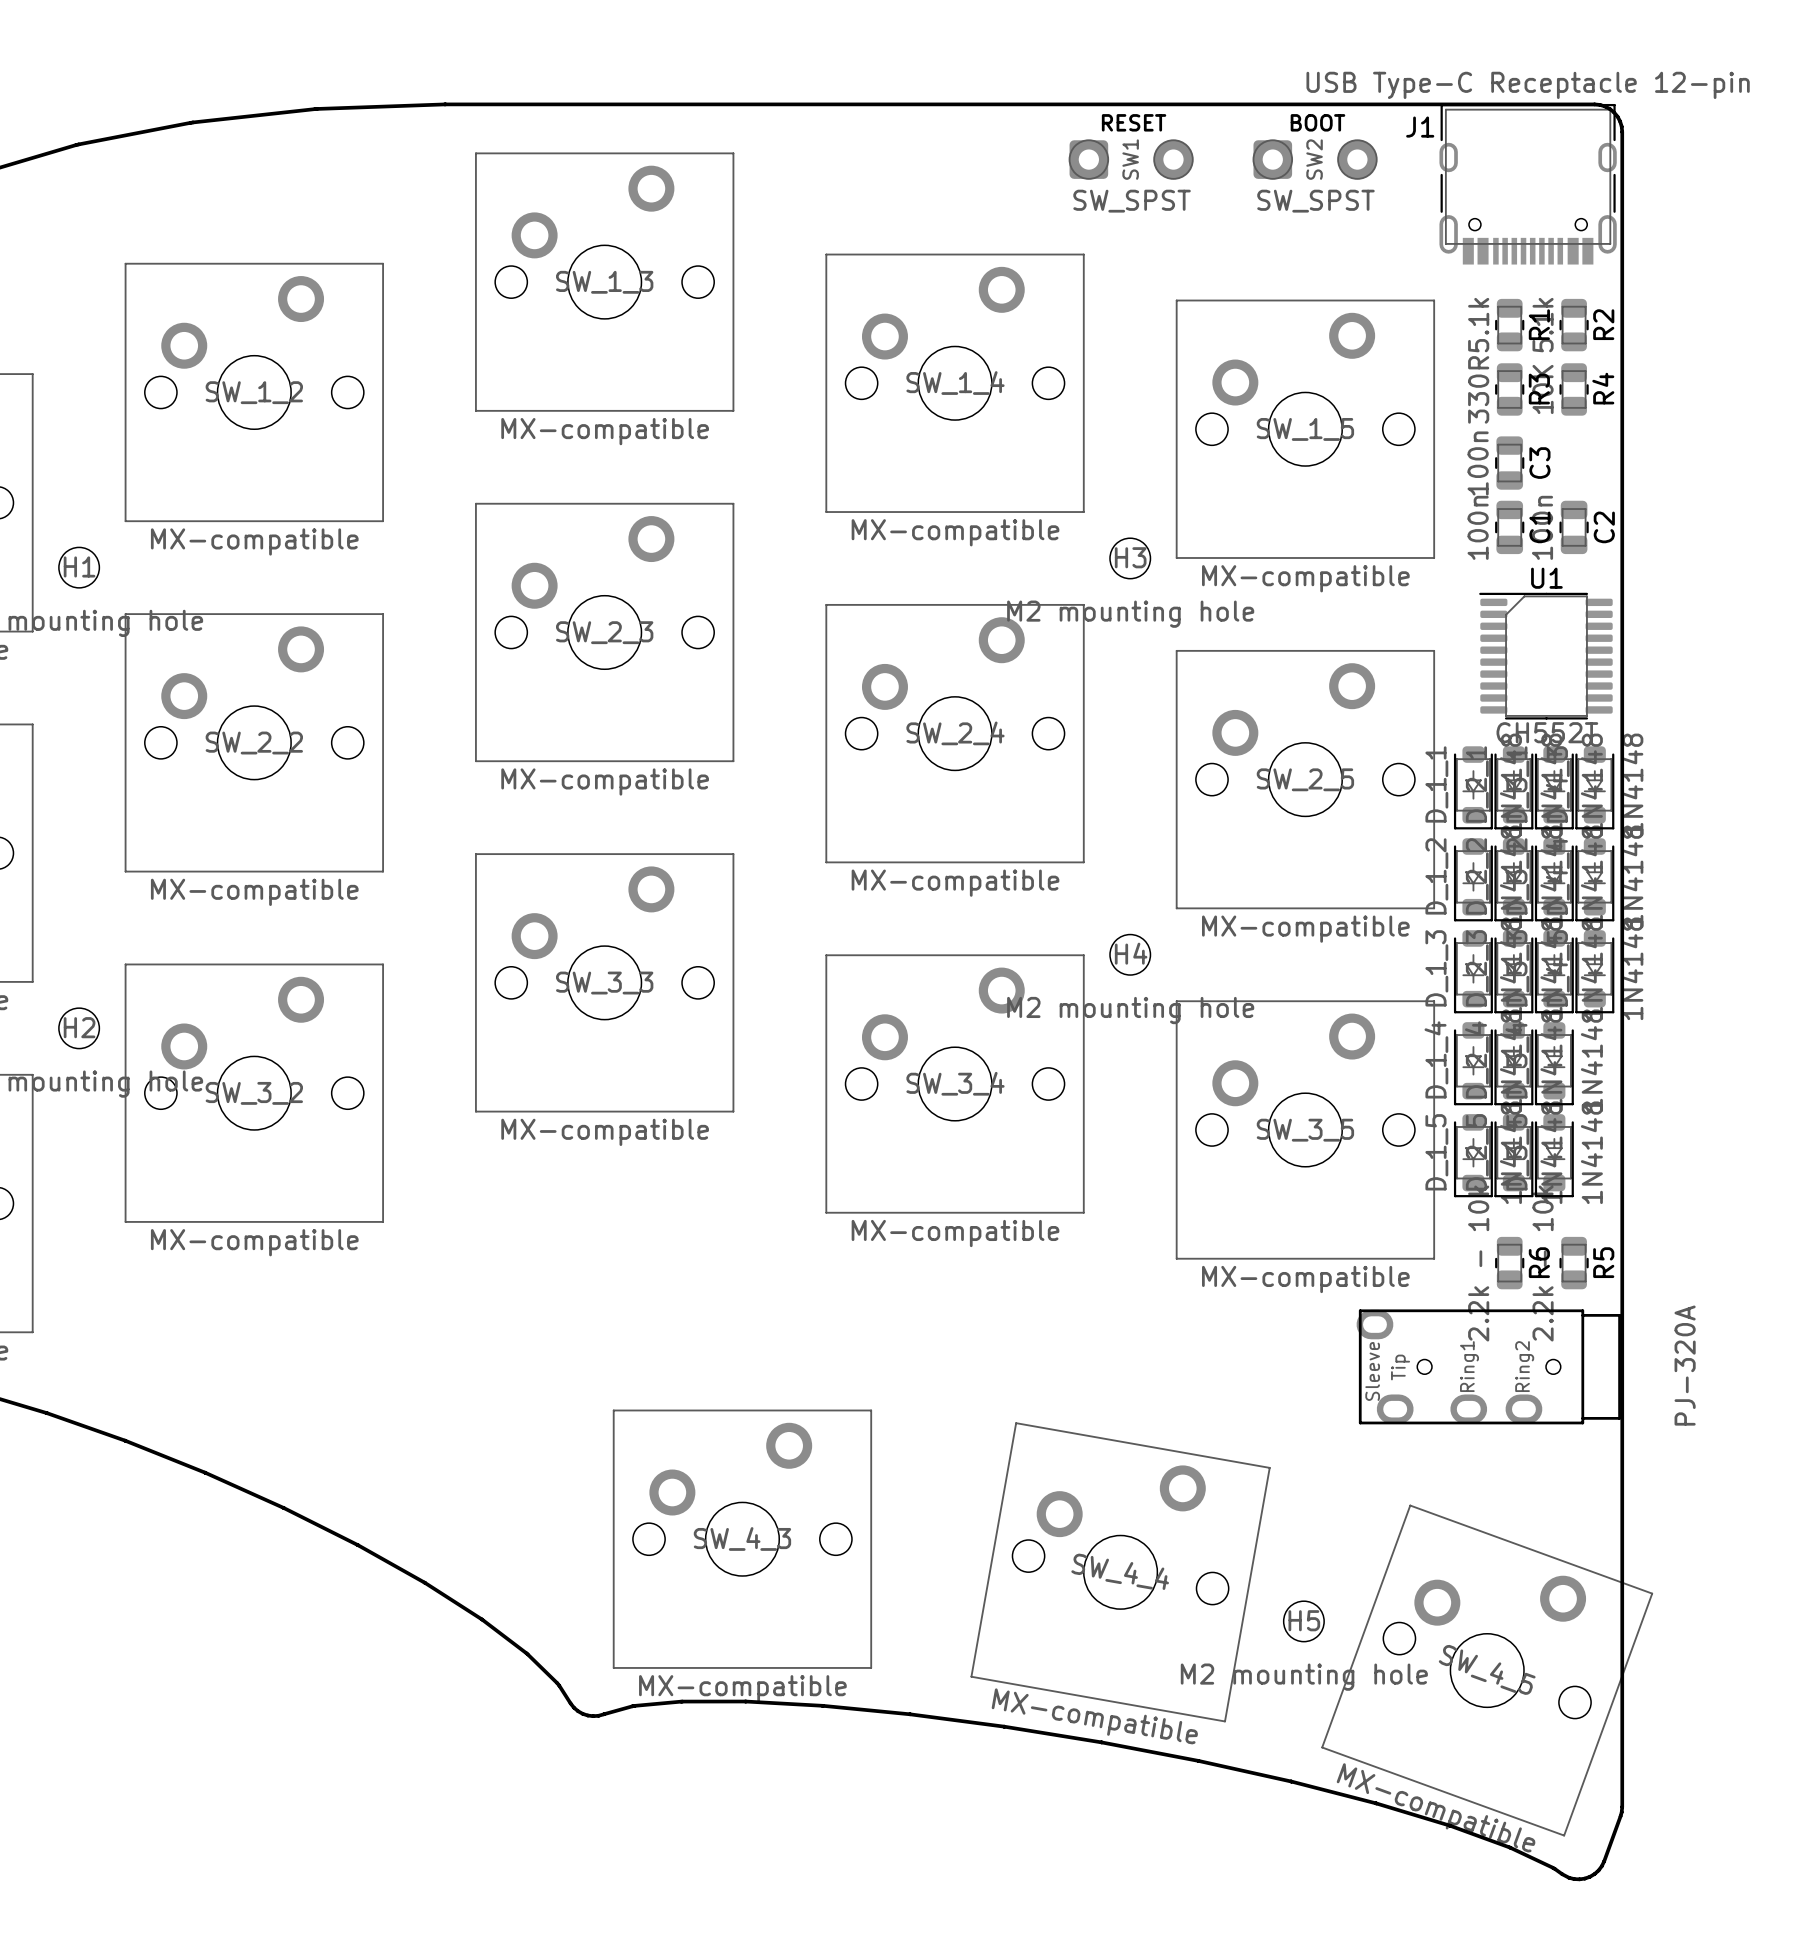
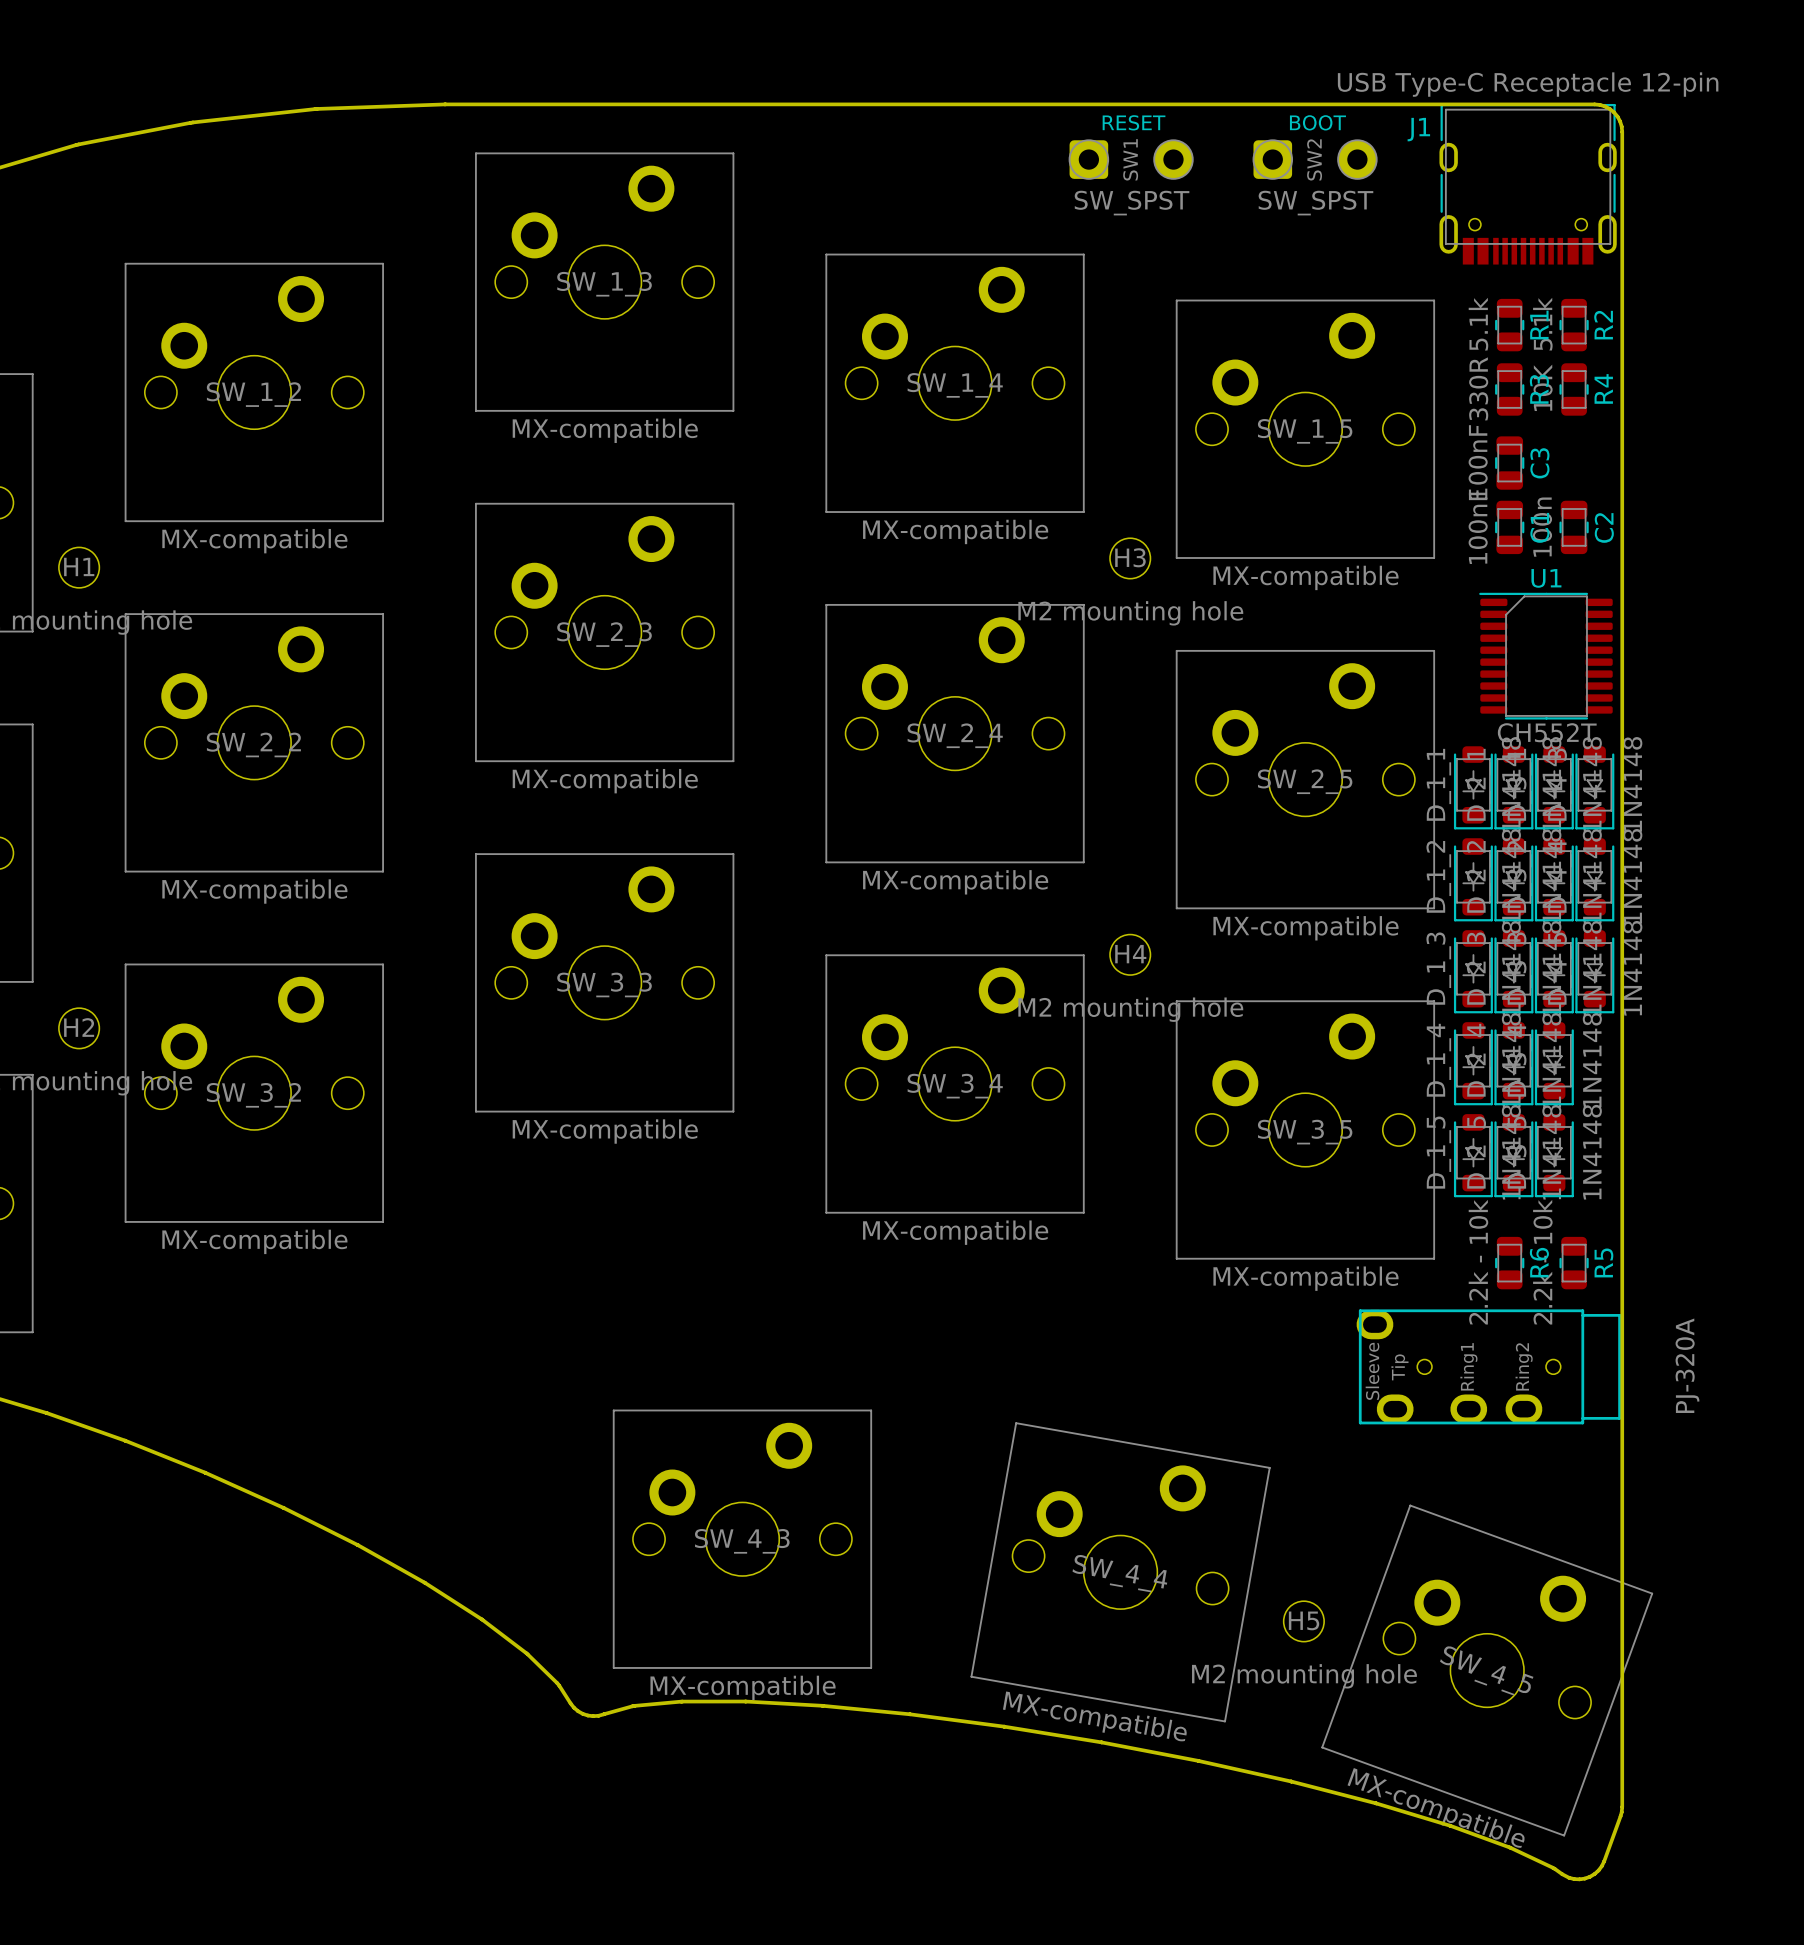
C3 value: 100n (1478, 463) -> 100nF (1478, 462)
C1 value: 100n (1478, 527) -> 100nF (1478, 526)

